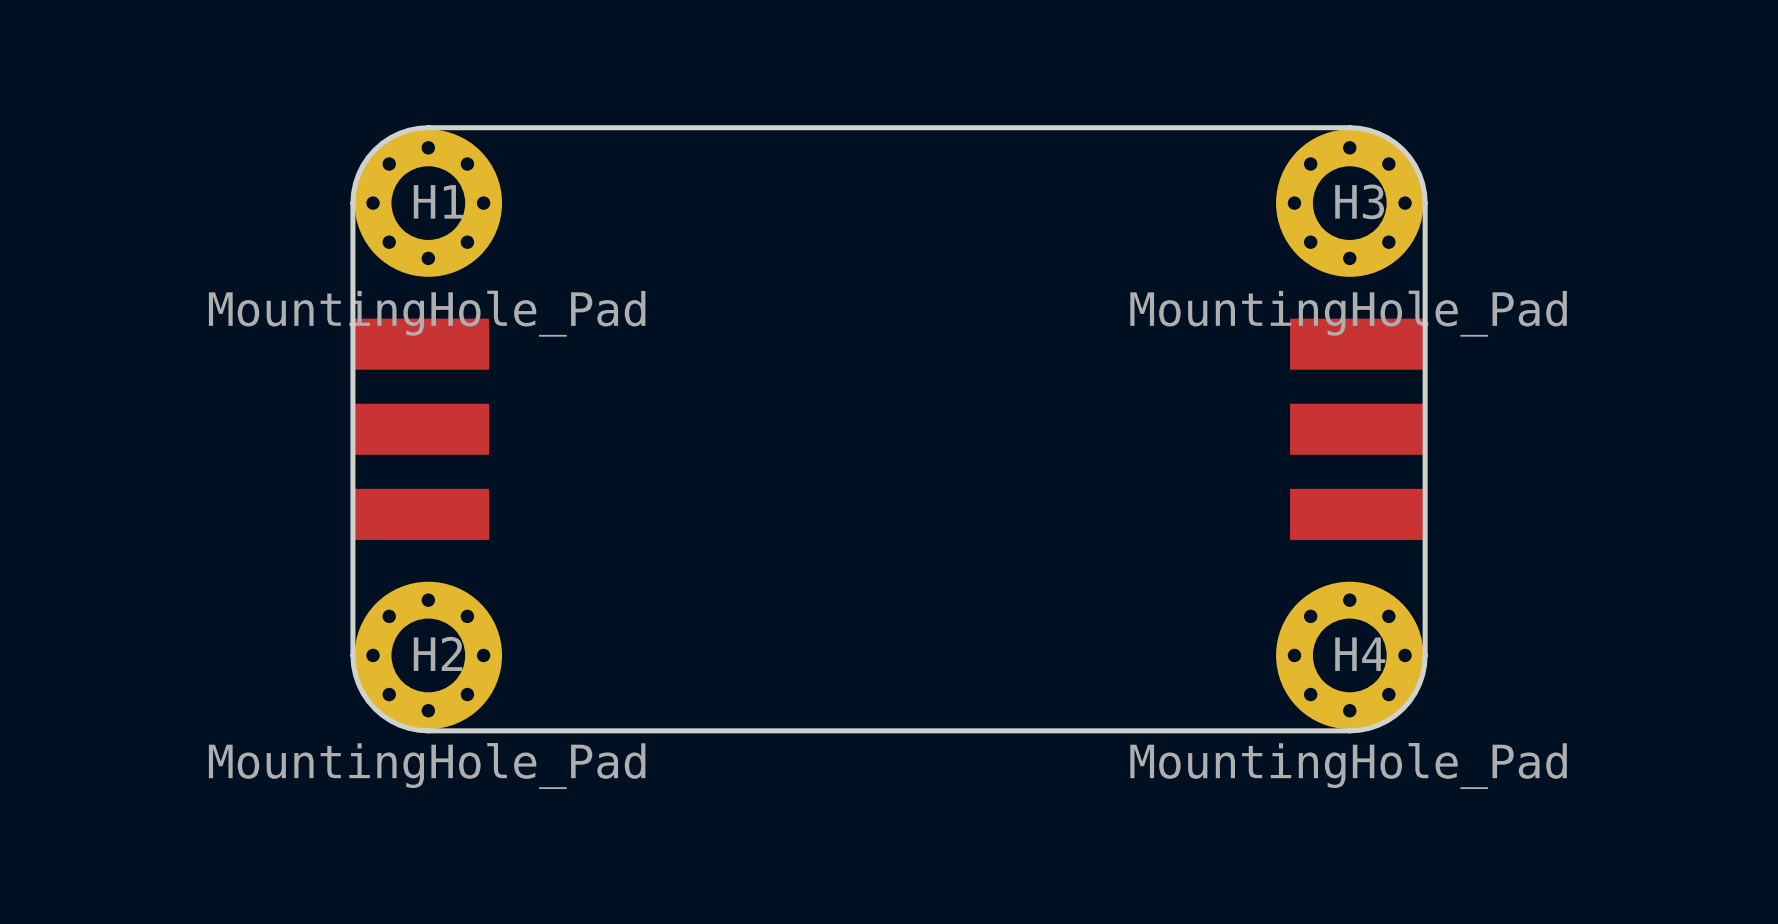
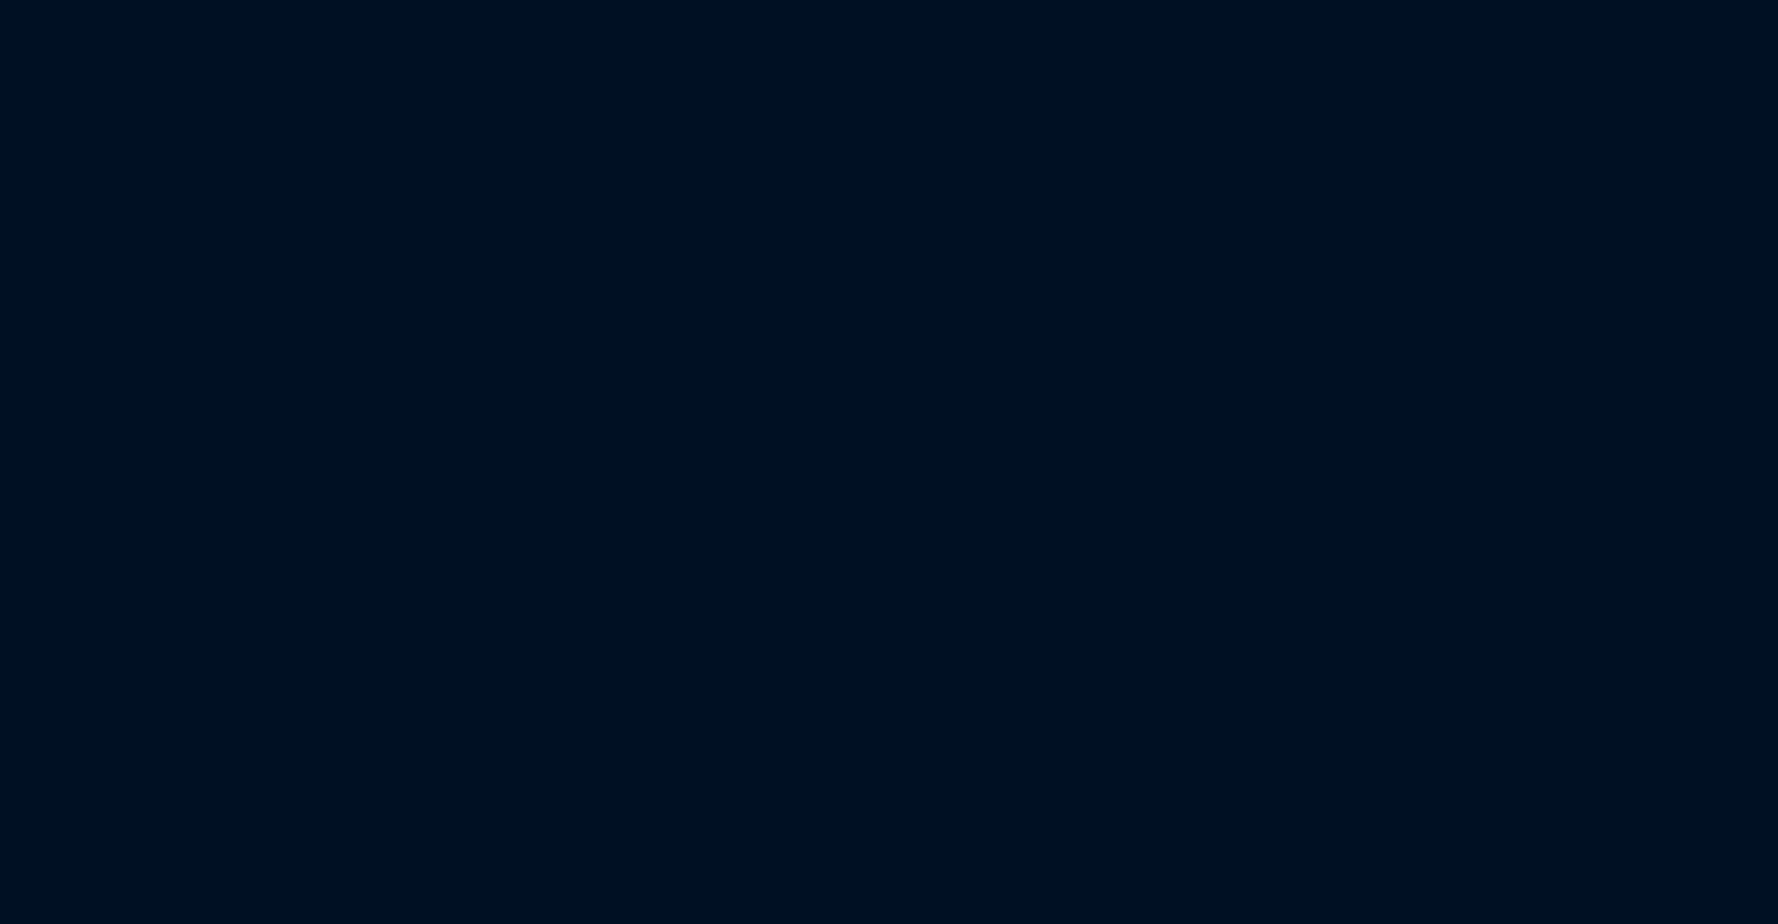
board edge: (428, 127) (1349, 127) (1369, 130) (1387, 137) (1403, 149) (1415, 165) (1422, 183) (1425, 203) (1425, 655) (1422, 674) (1415, 693) (1403, 708) (1387, 720) (1369, 728) (1349, 730) (428, 730) (408, 728) (390, 720) (368, 701) (358, 684) (353, 665) (352, 203) (358, 174) (375, 149) (399, 133) (428, 127) -> none
H1: MountingHole_Pad (428, 203) -> none
H3: MountingHole_Pad (1349, 203) -> none
part: (421, 429) -> none
part: (1358, 429) -> none
H2: MountingHole_Pad (428, 655) -> none
H4: MountingHole_Pad (1349, 655) -> none

